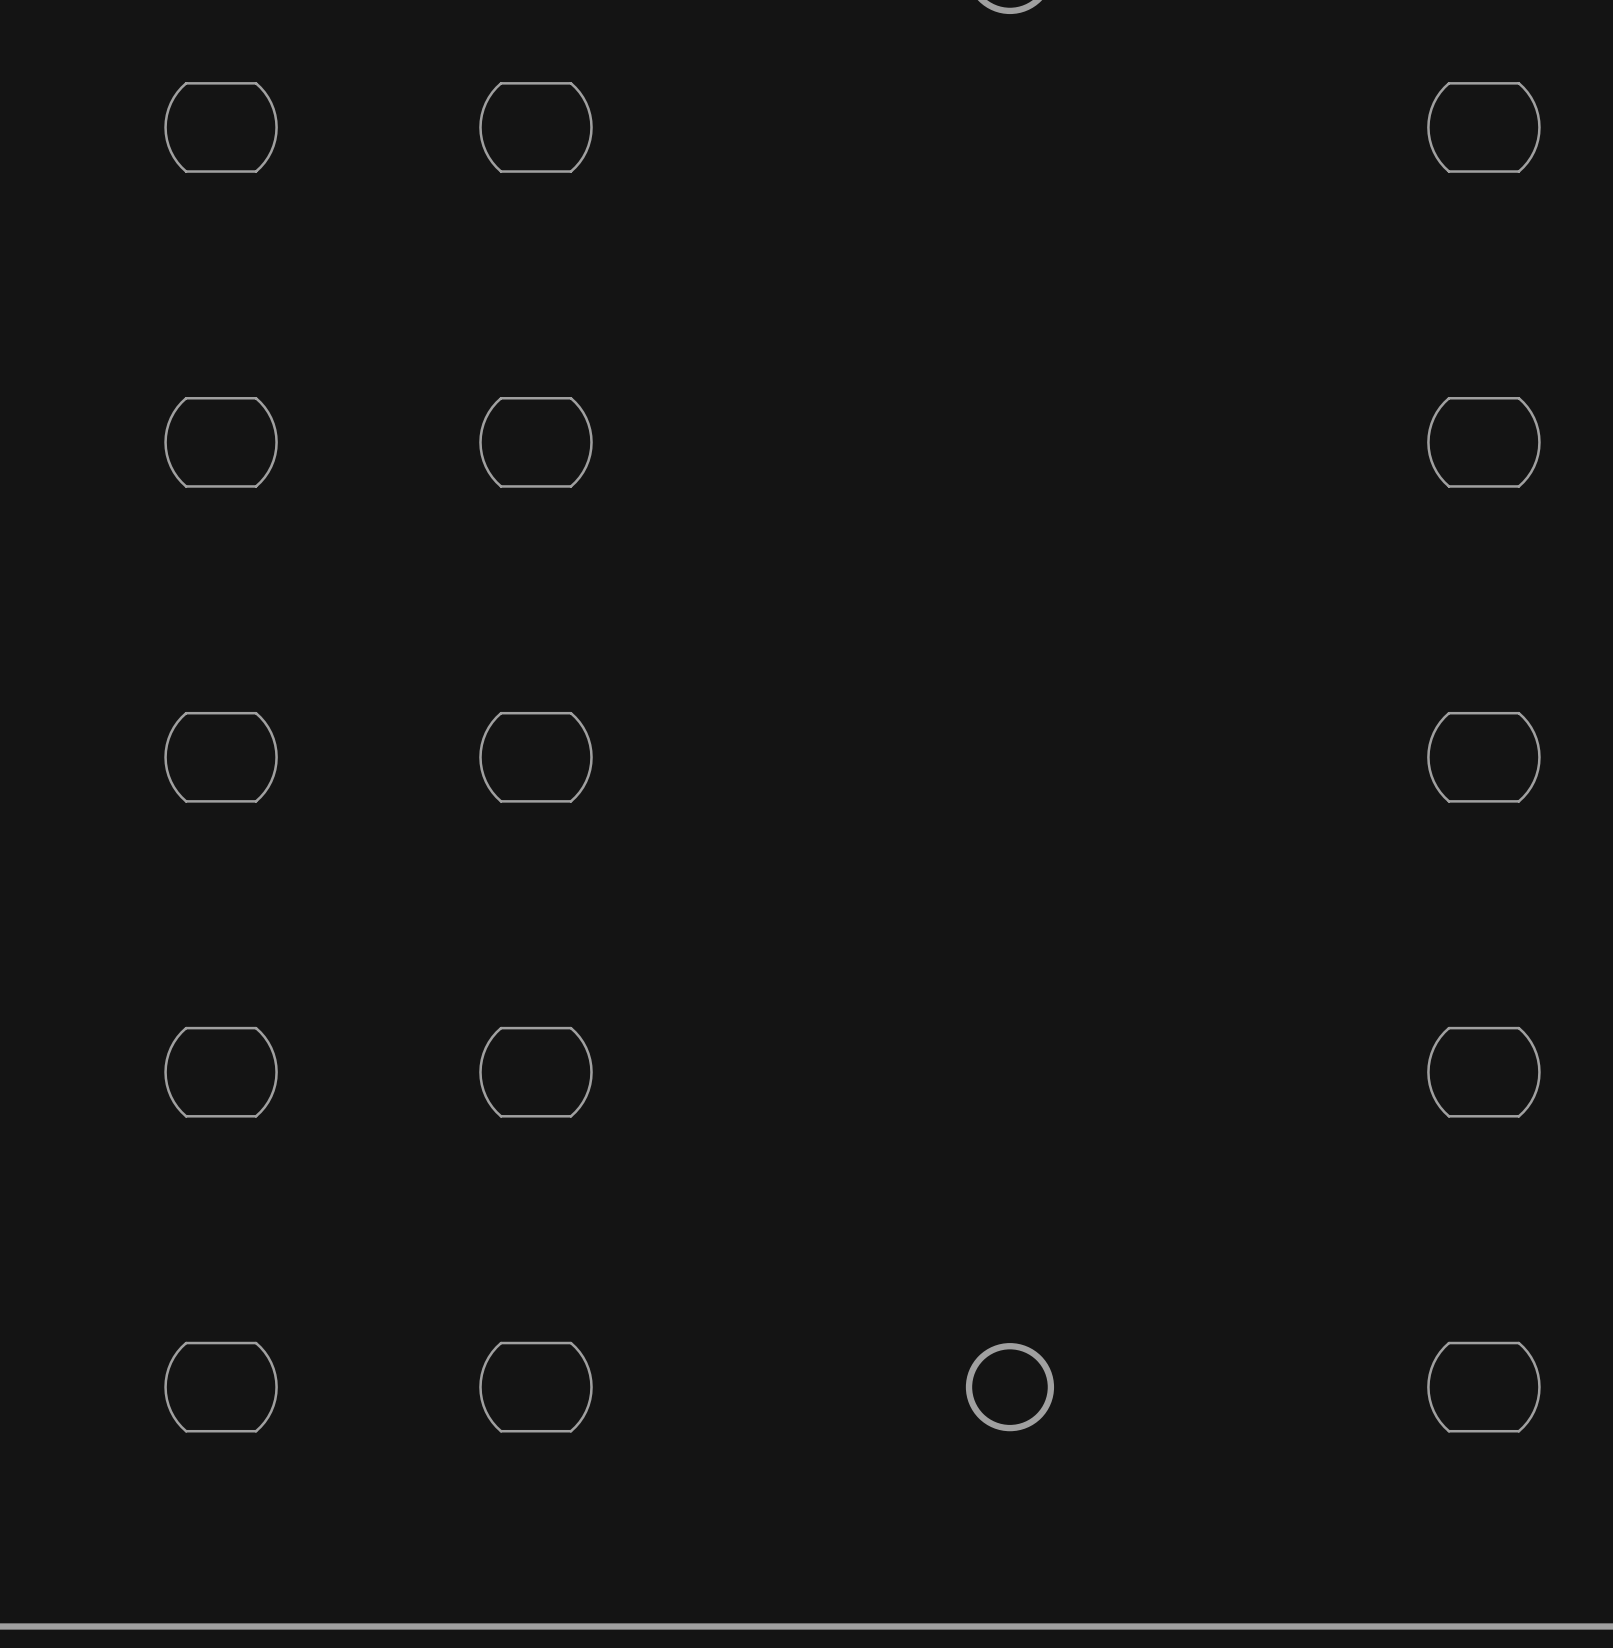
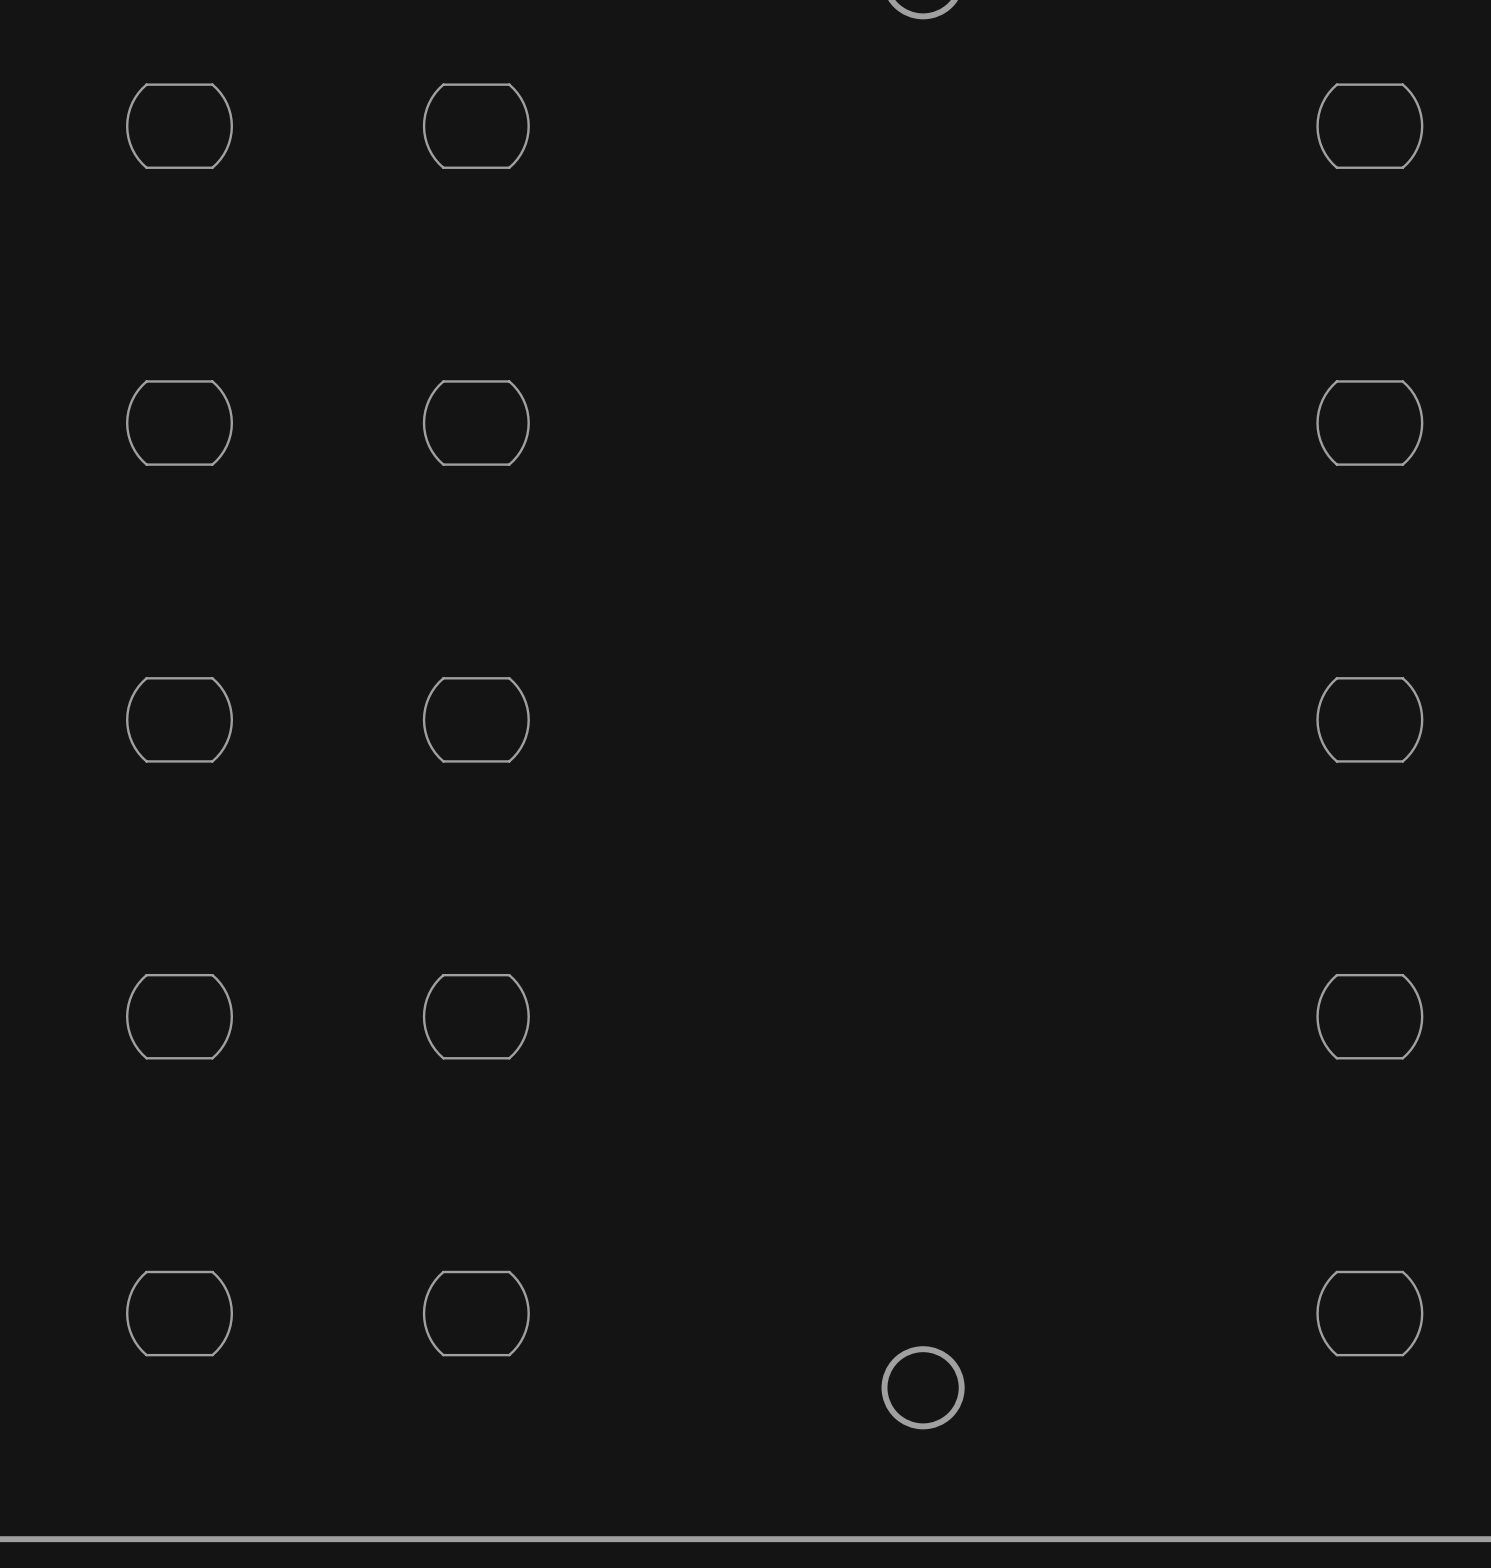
round board edge position: (1009, 1387) -> (923, 1387)

